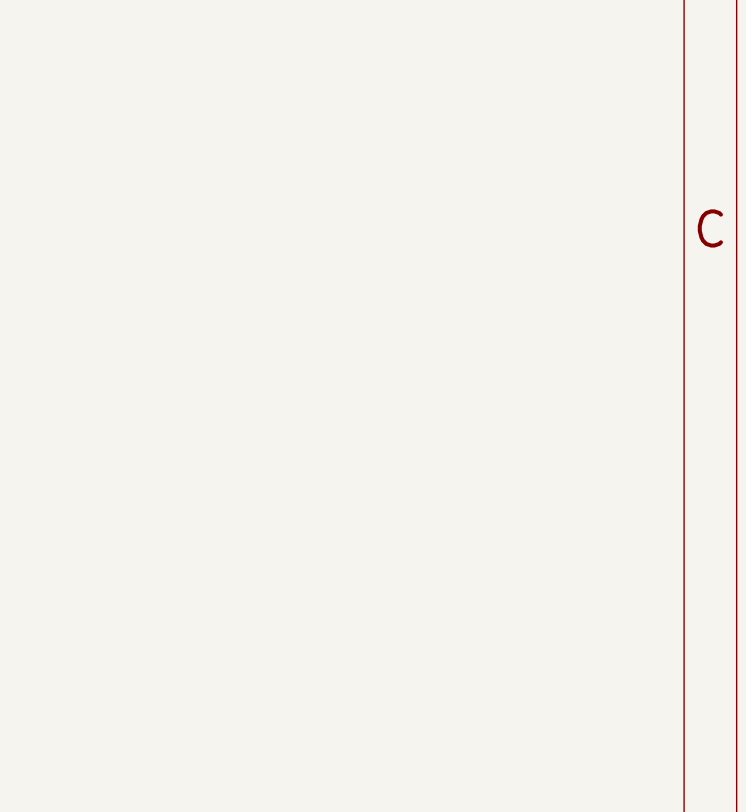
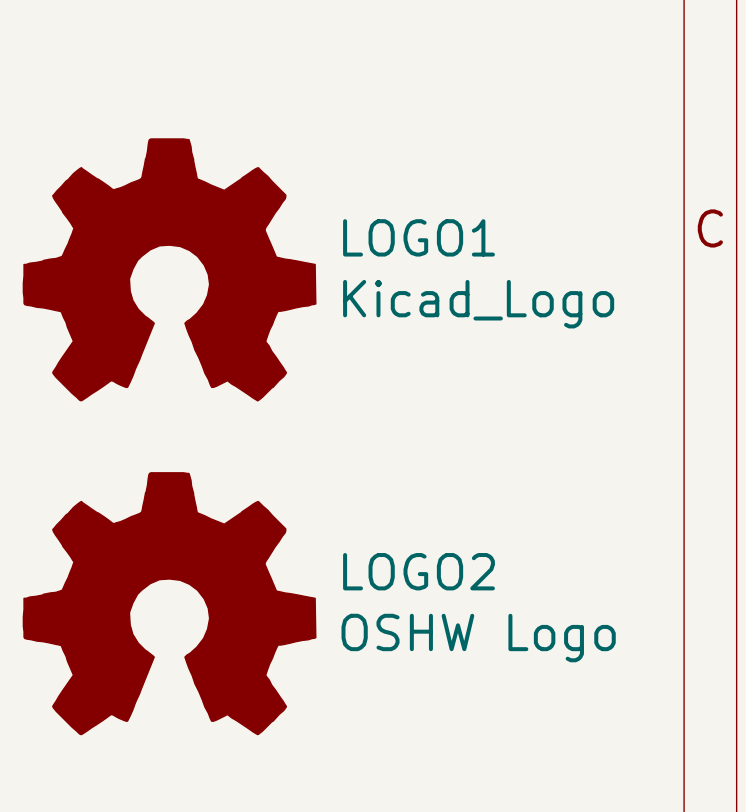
LOGO1: none -> Kicad_Logo (169, 269)
LOGO2: none -> OSHW Logo (169, 603)

